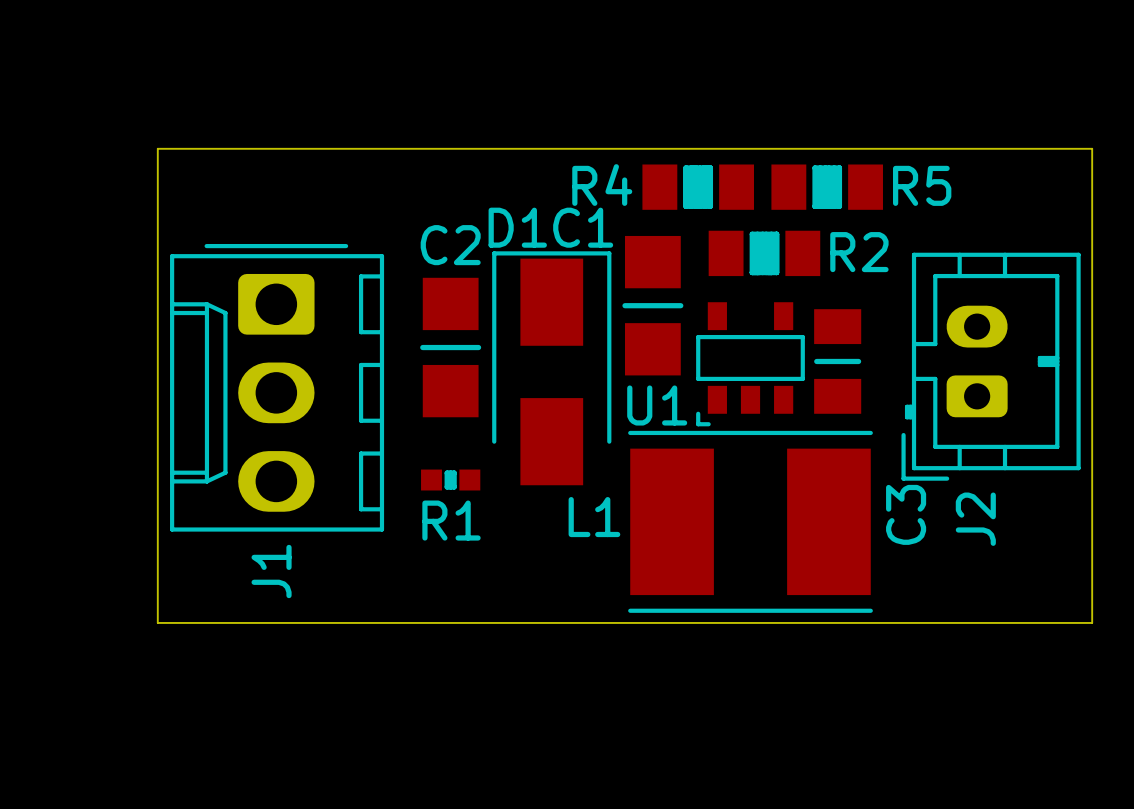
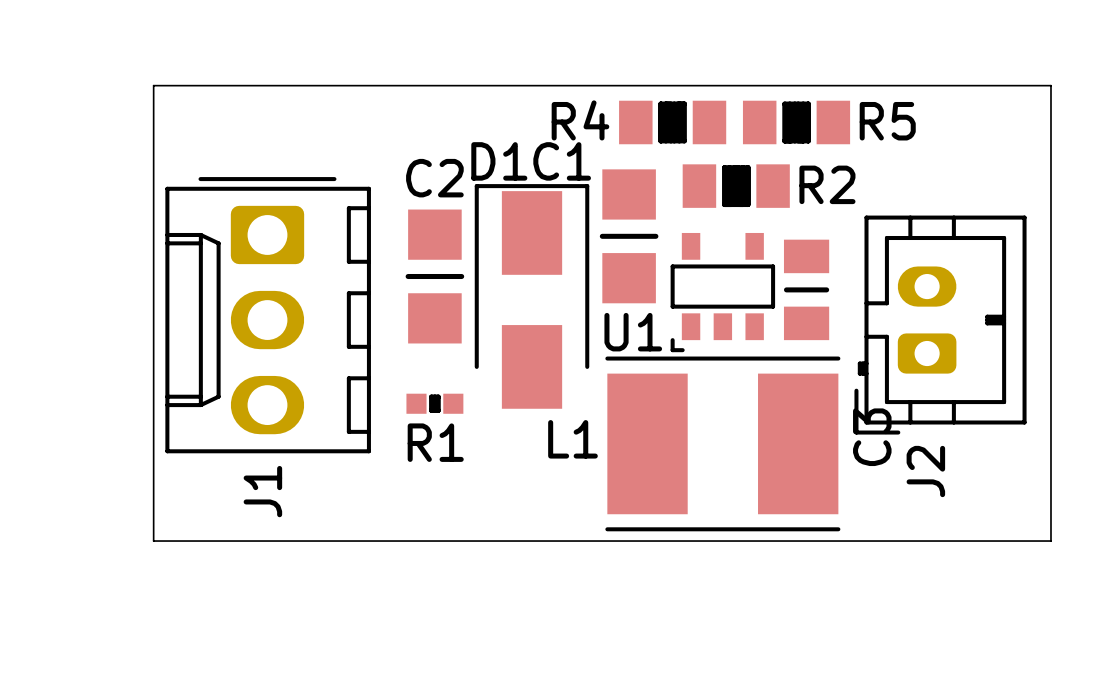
J2 position: (991, 366) -> (940, 325)

